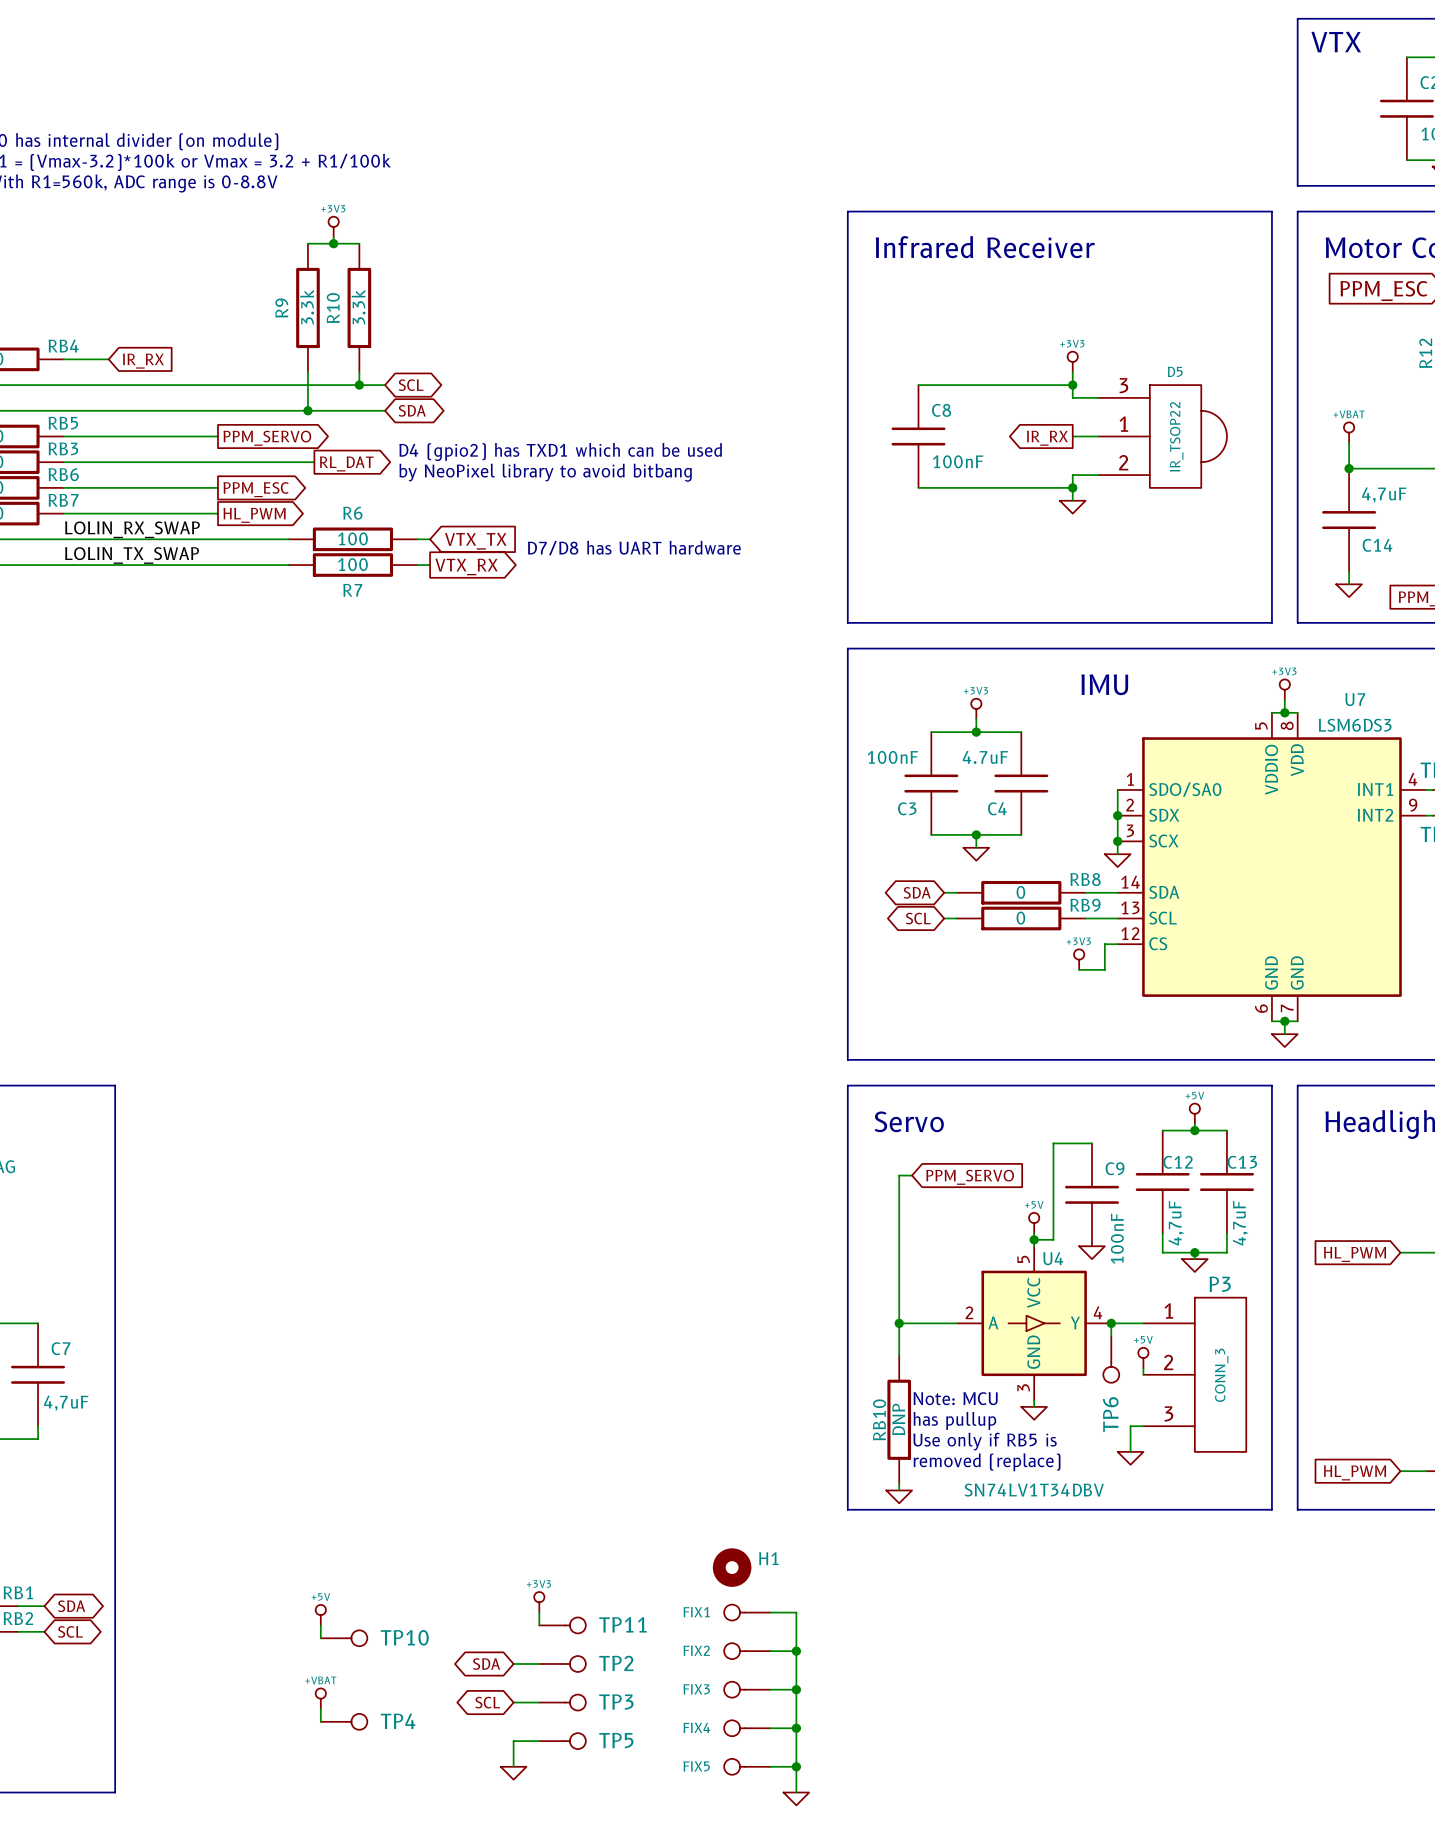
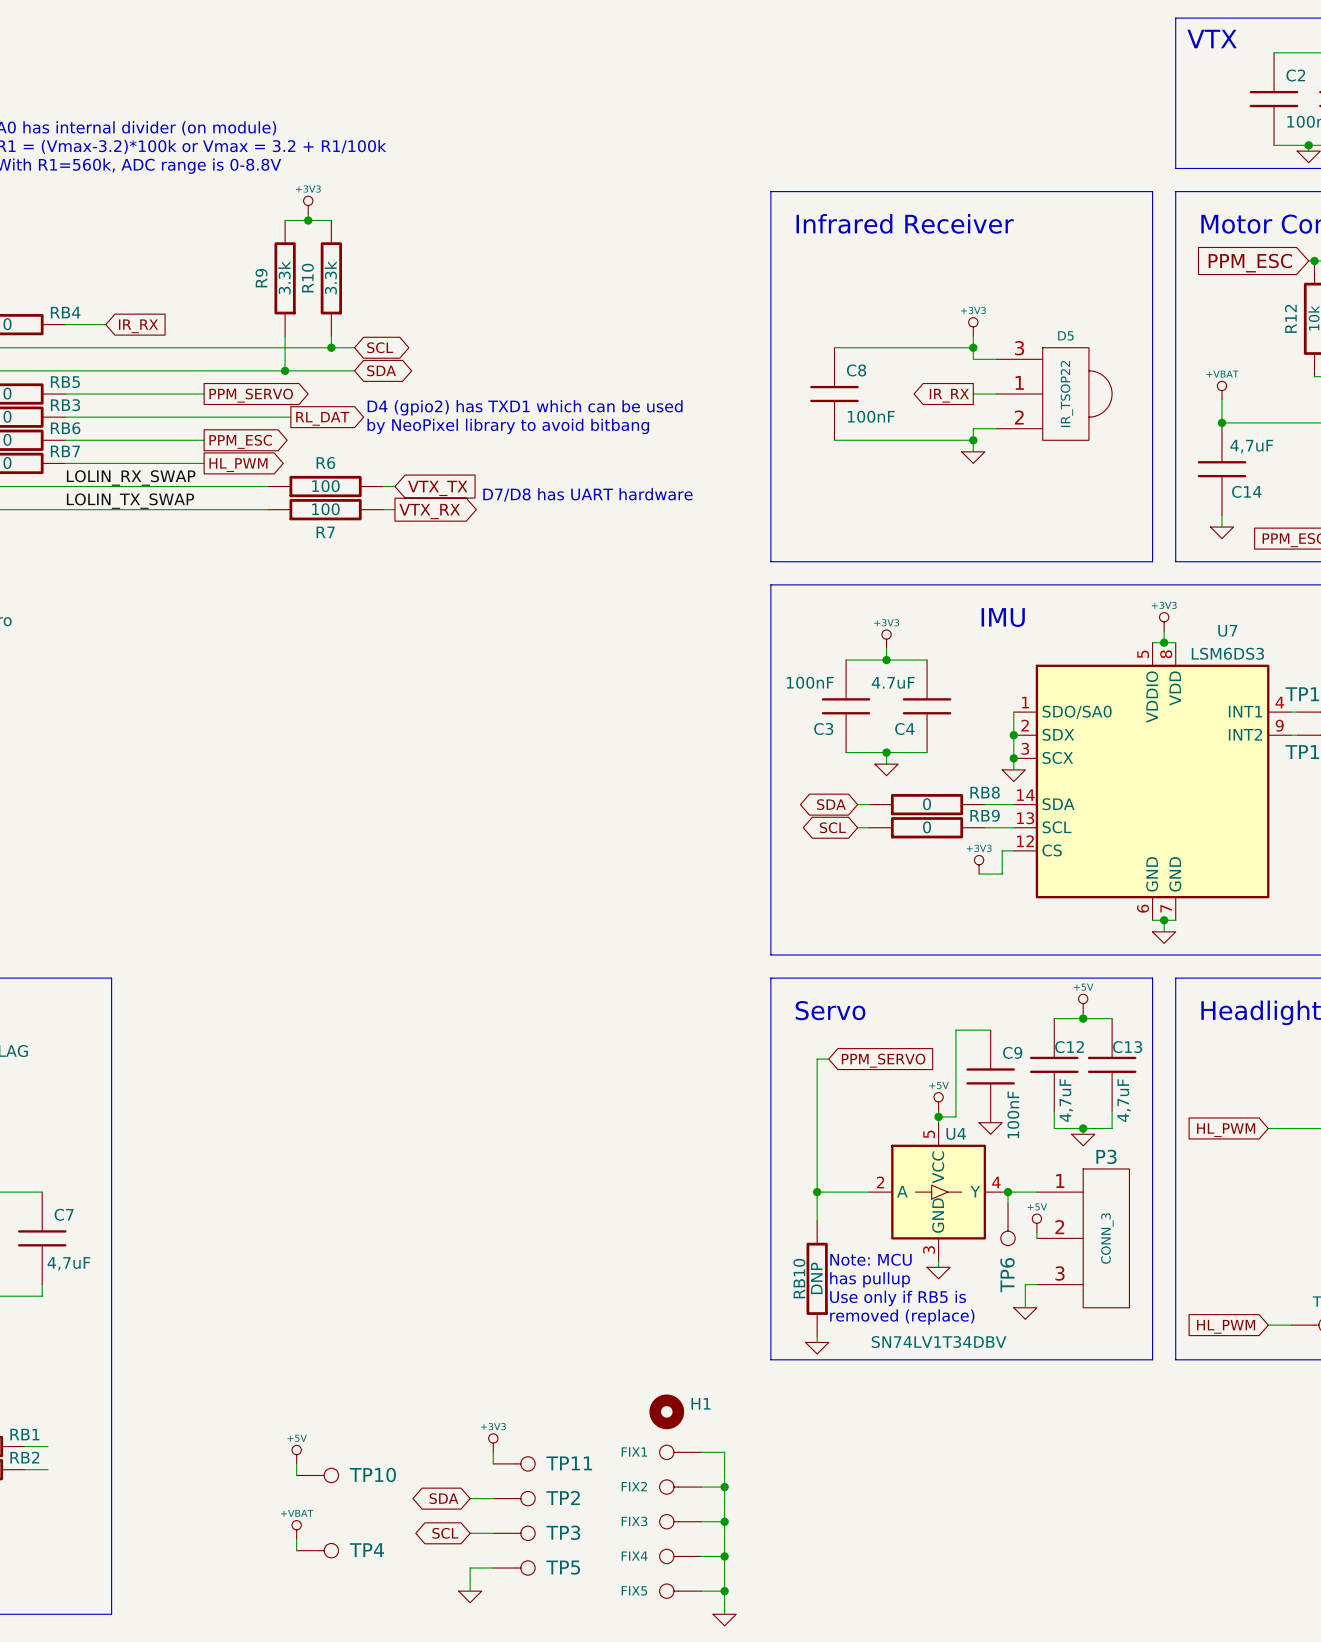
global label: SDA (71, 1606) -> none
global label: SCL (70, 1631) -> none

